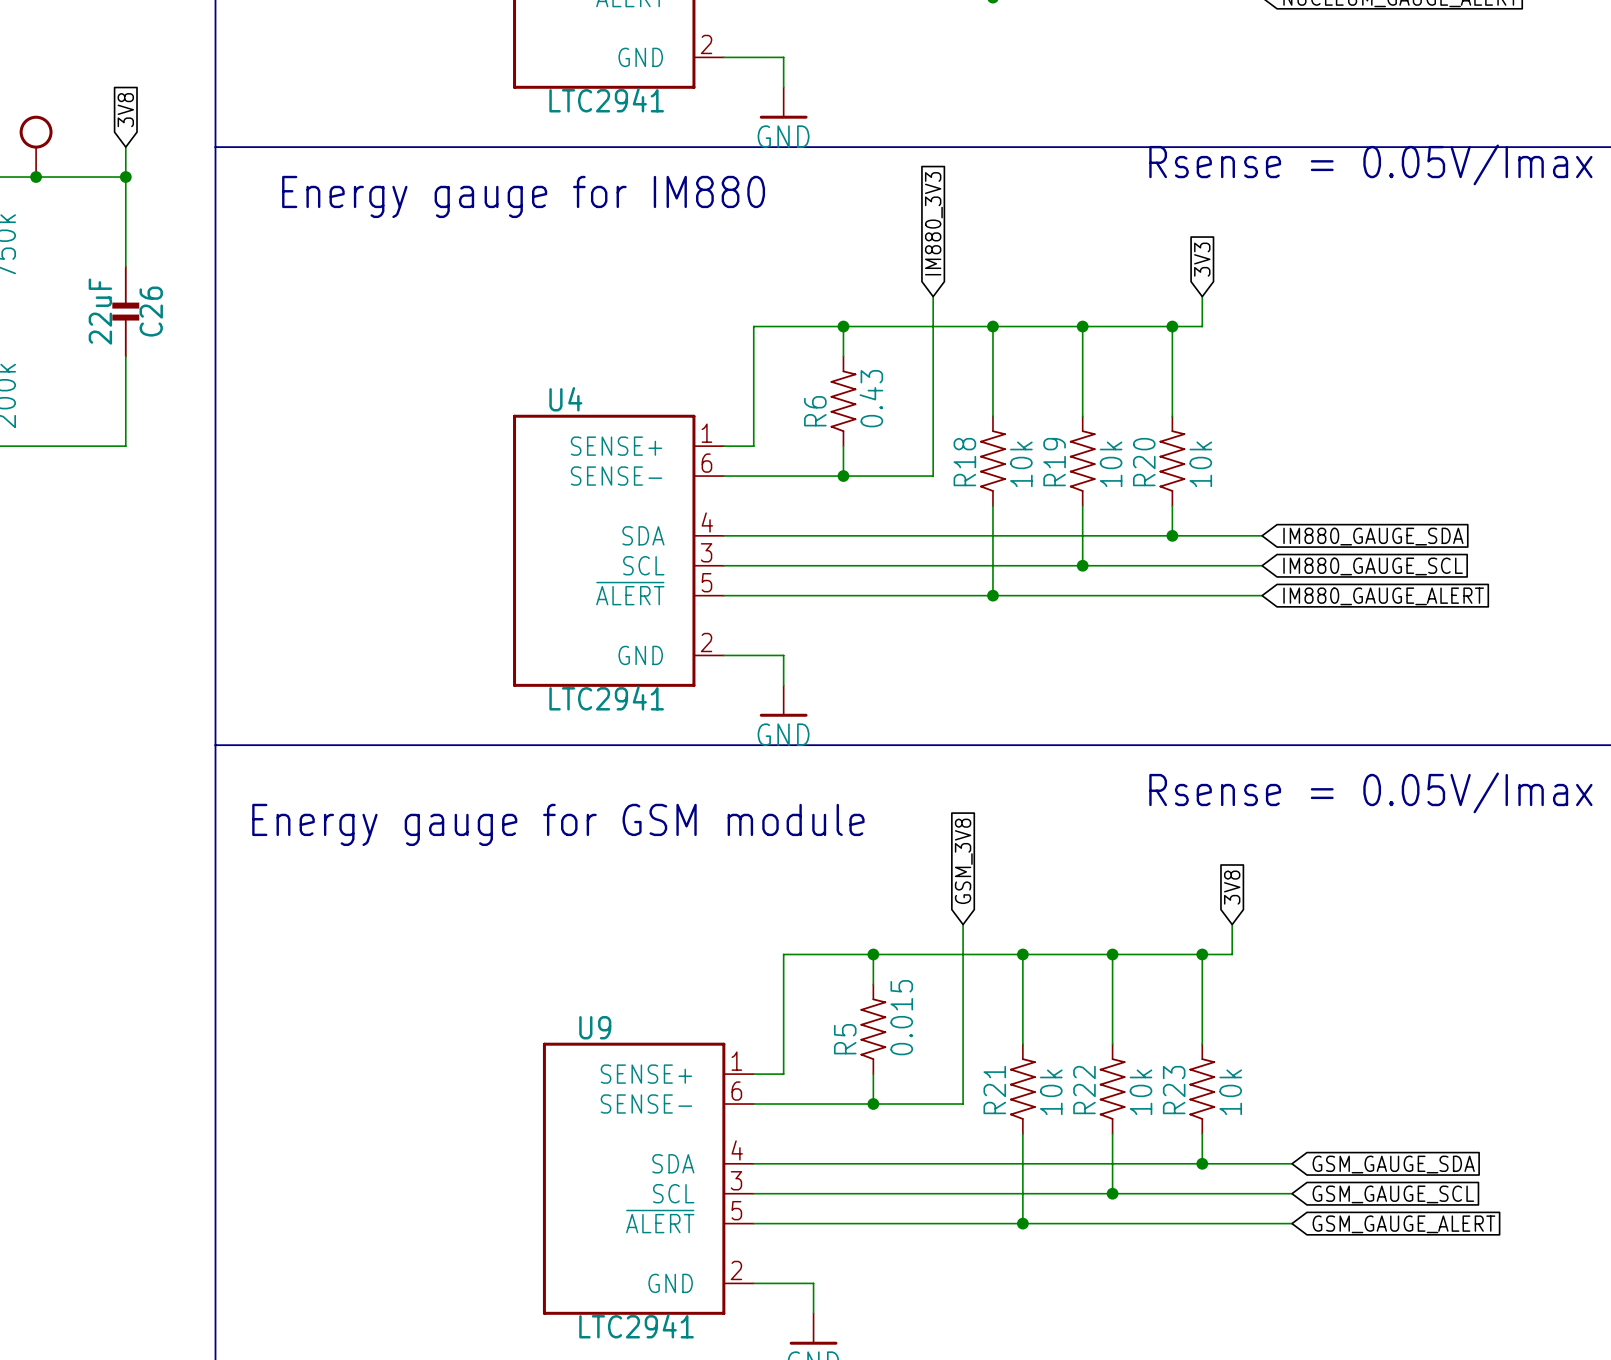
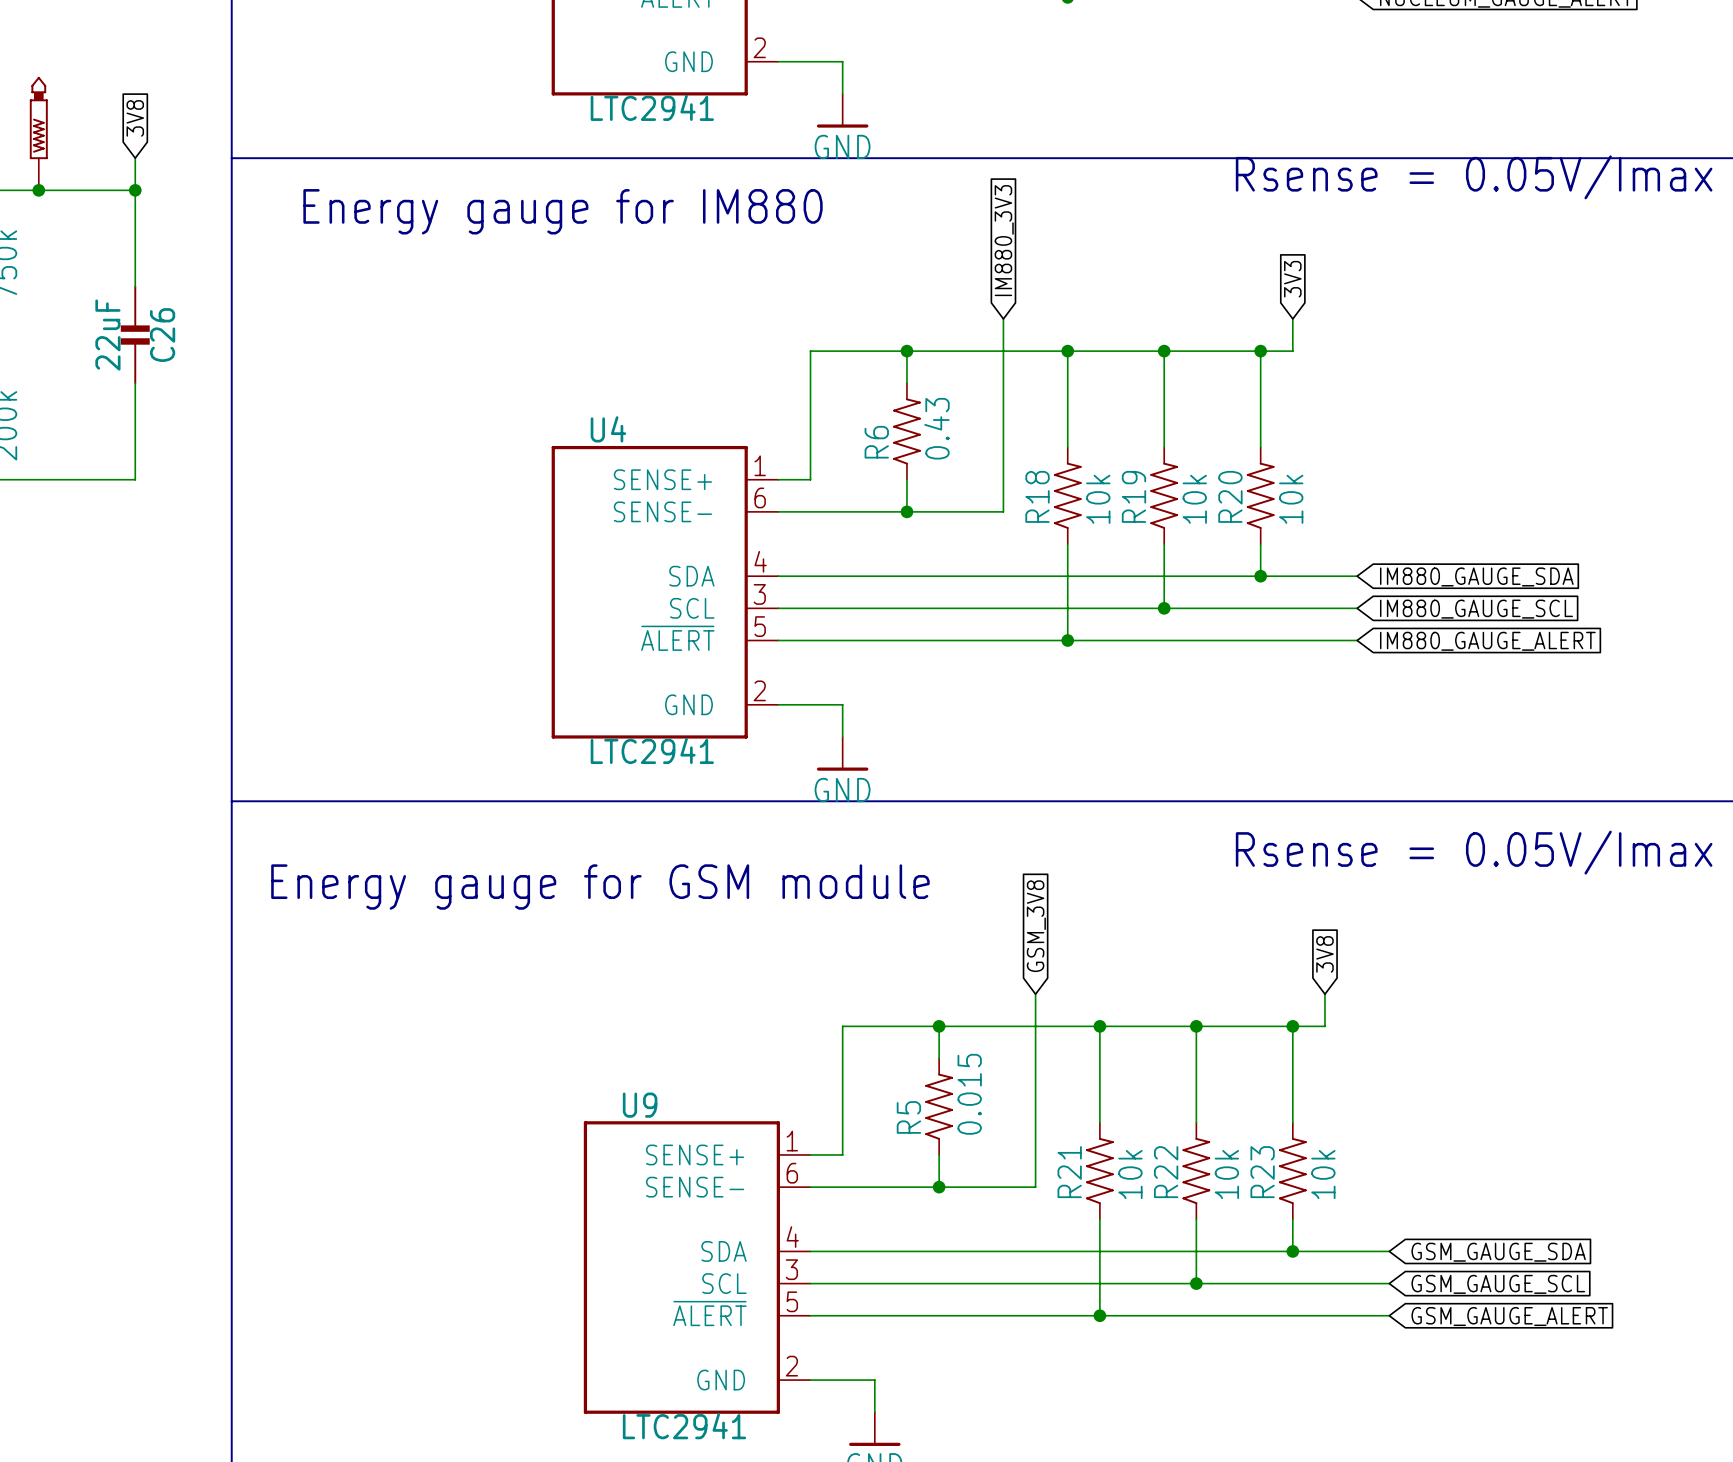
part: none -> (38, 133)
part: (36, 146) -> none

